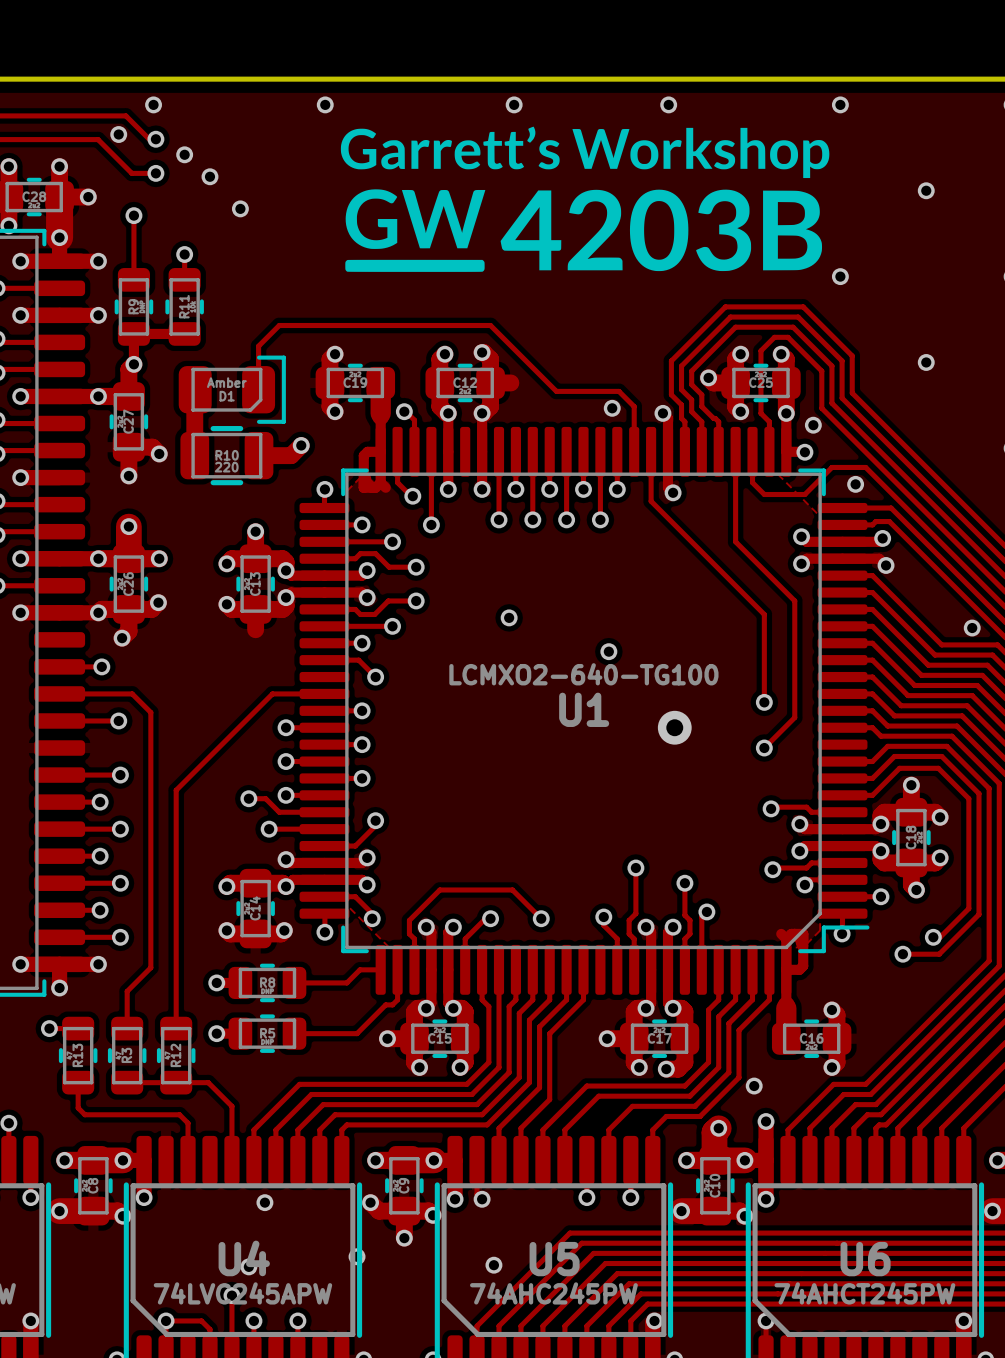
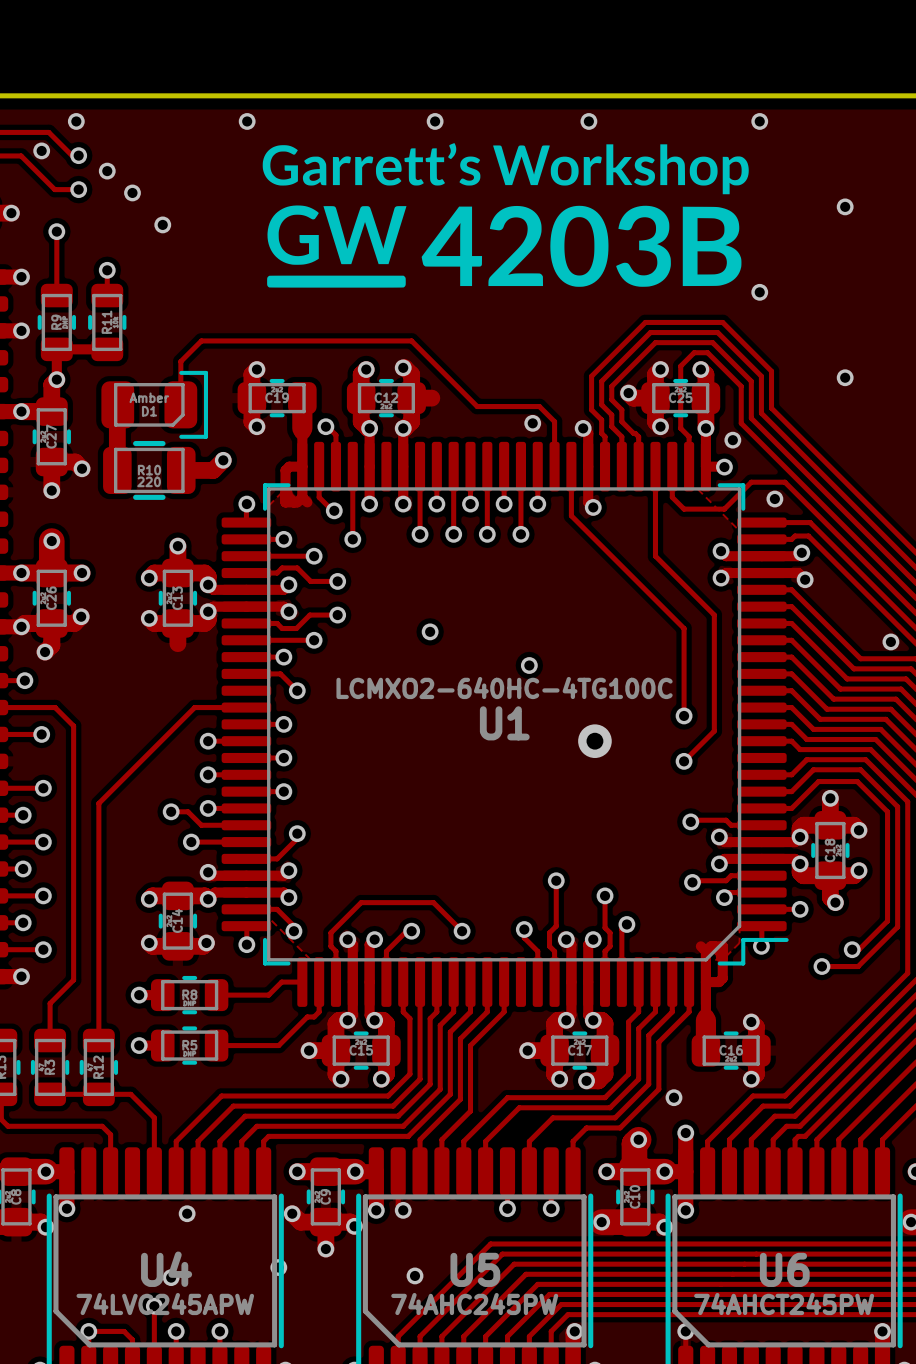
U1 value: LCMXO2-640-TG100 (583, 674) -> LCMXO2-640HC-4TG100C (504, 688)

